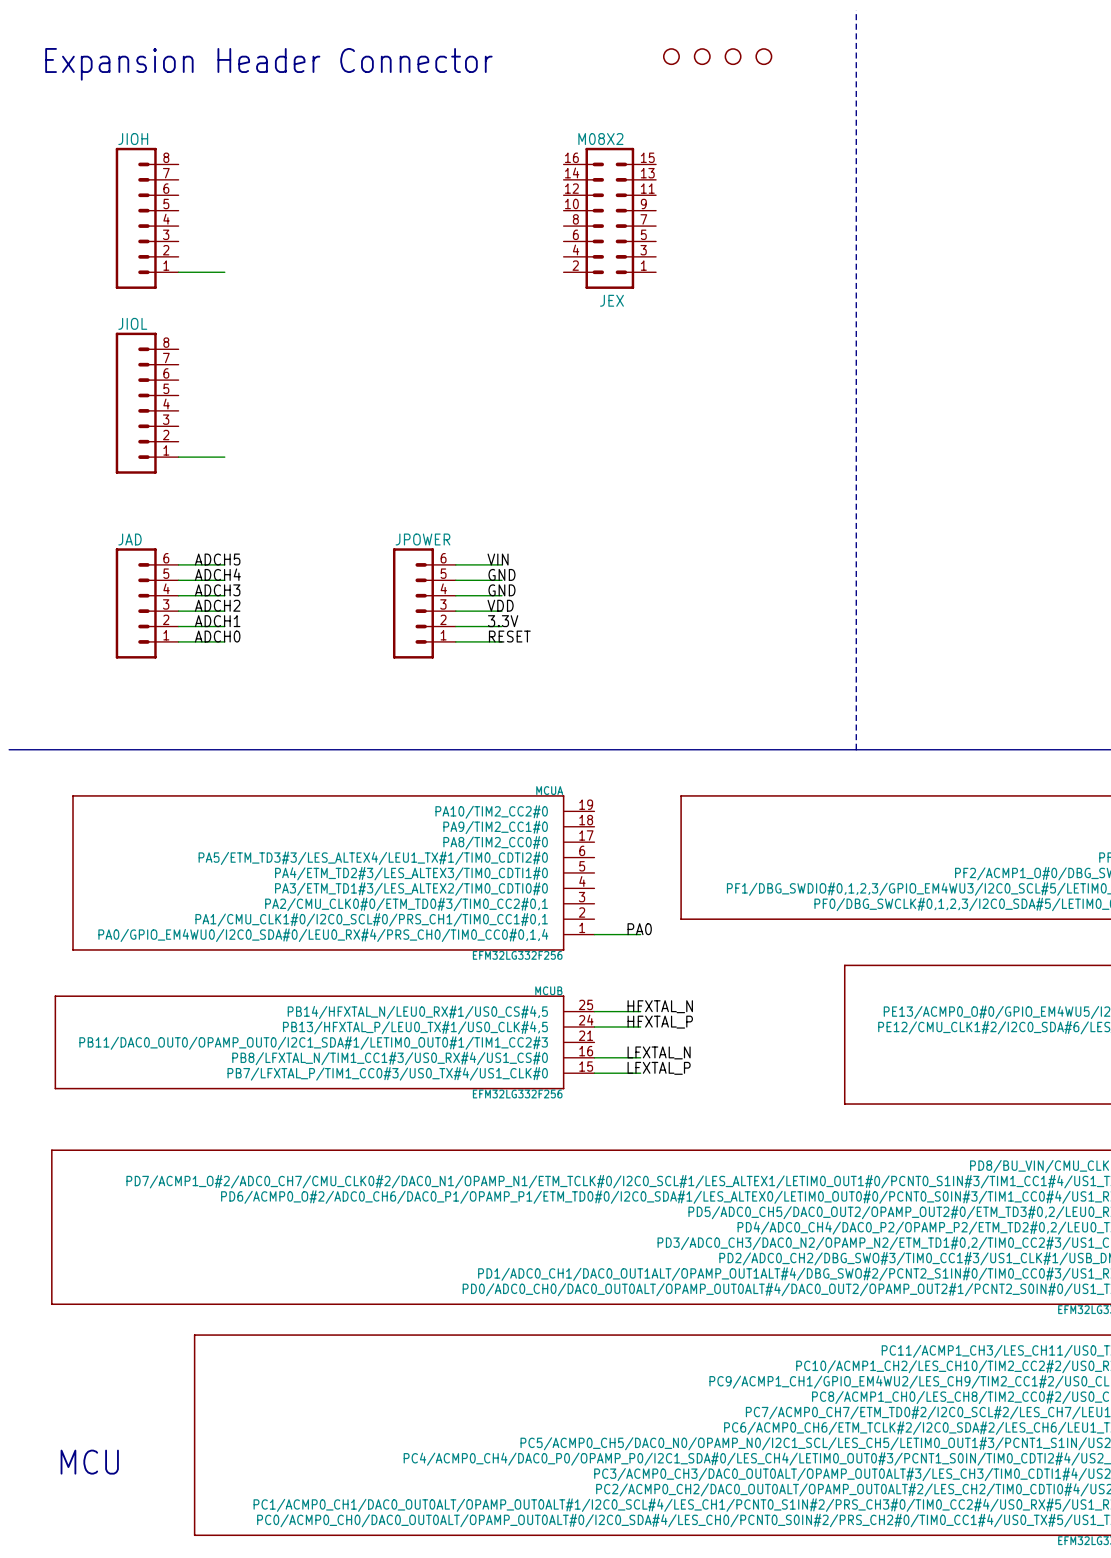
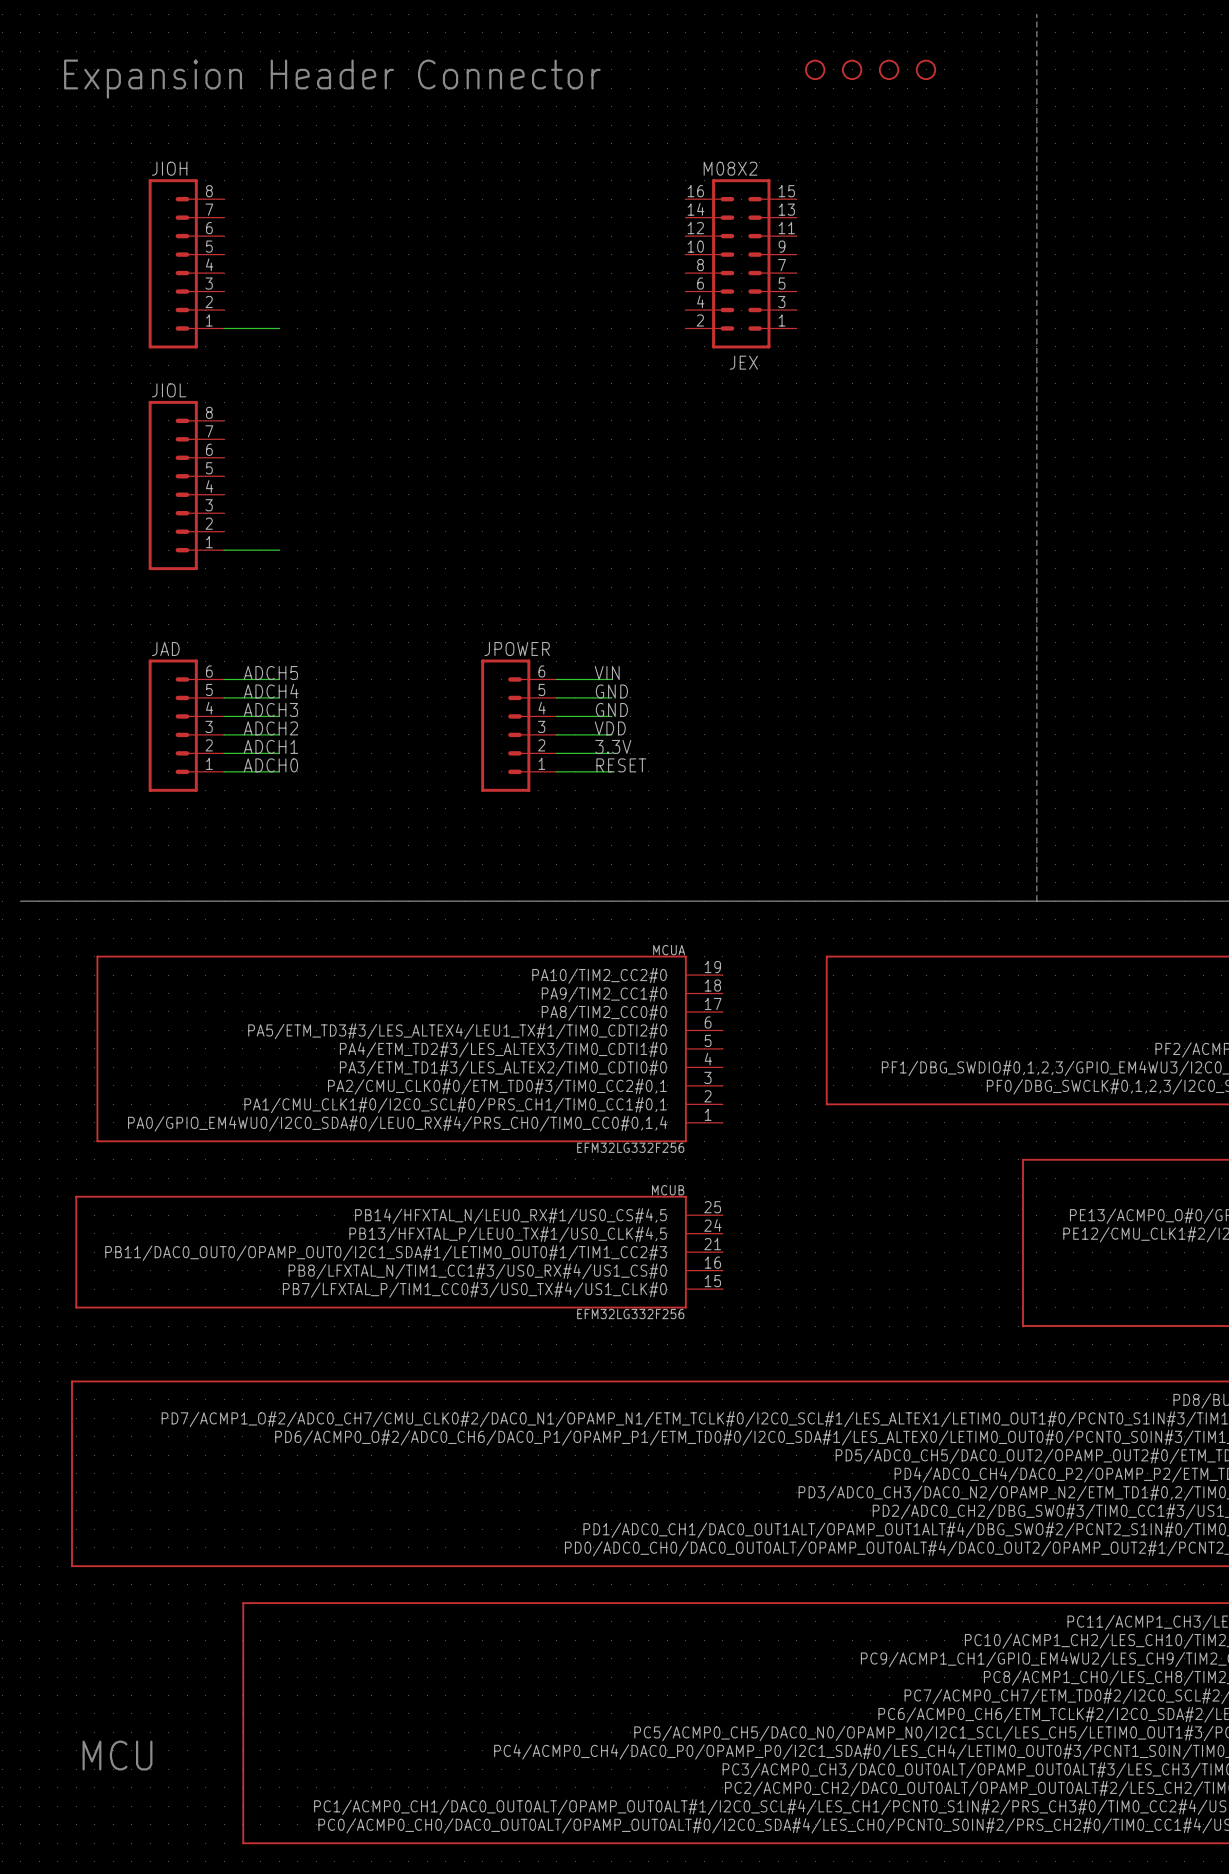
label: PA0 (639, 929) -> none
wire: (594, 934) (640, 934) -> none
label: HFXTAL_N (660, 1006) -> none
wire: (594, 1011) (640, 1011) -> none
label: HFXTAL_P (660, 1022) -> none
wire: (594, 1027) (640, 1027) -> none
label: LFXTAL_N (659, 1052) -> none
wire: (594, 1057) (640, 1057) -> none
label: LFXTAL_P (659, 1068) -> none
wire: (594, 1073) (640, 1073) -> none

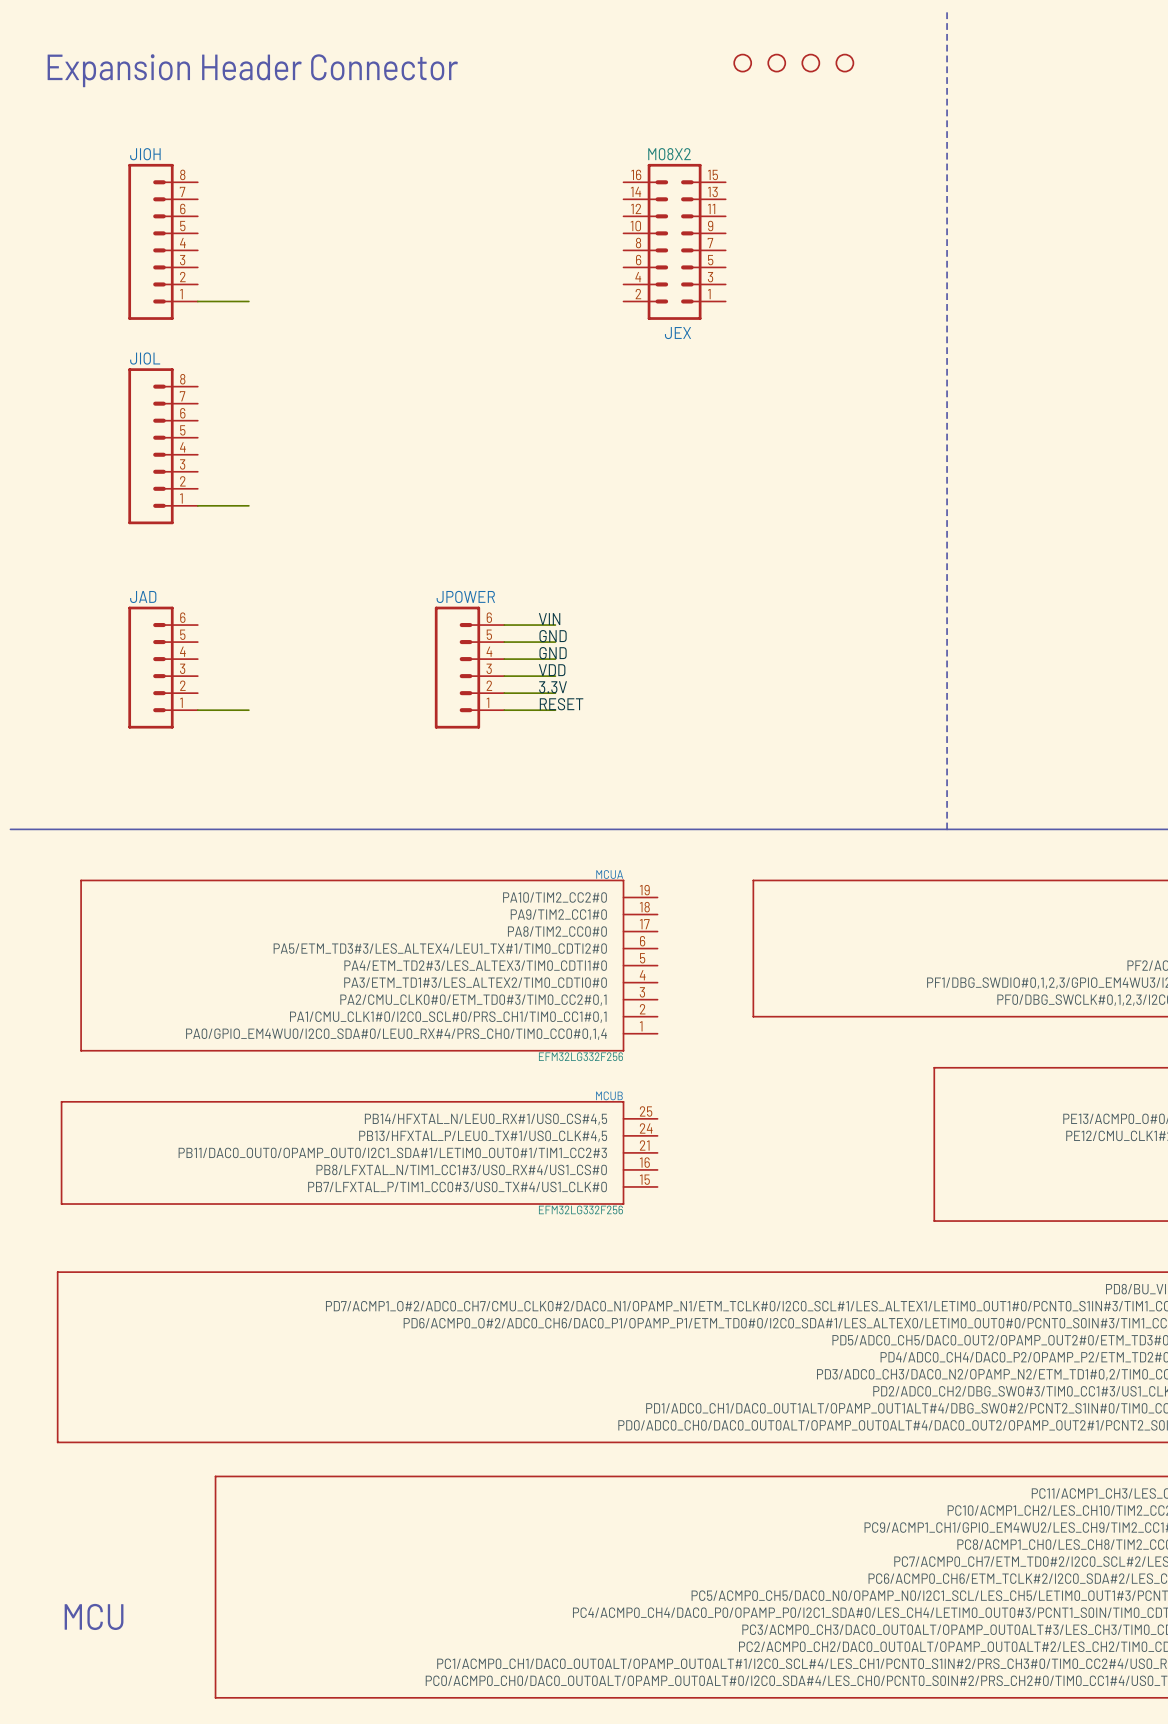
label: ADCH5 (270, 673) -> none
wire: (224, 679) (279, 679) -> none
label: ADCH4 (271, 691) -> none
wire: (224, 697) (279, 697) -> none
label: ADCH3 (270, 709) -> none
wire: (224, 716) (279, 716) -> none
label: ADCH2 (270, 728) -> none
wire: (224, 734) (279, 734) -> none
label: ADCH1 (270, 746) -> none
wire: (224, 753) (279, 753) -> none
label: ADCH0 (270, 765) -> none

